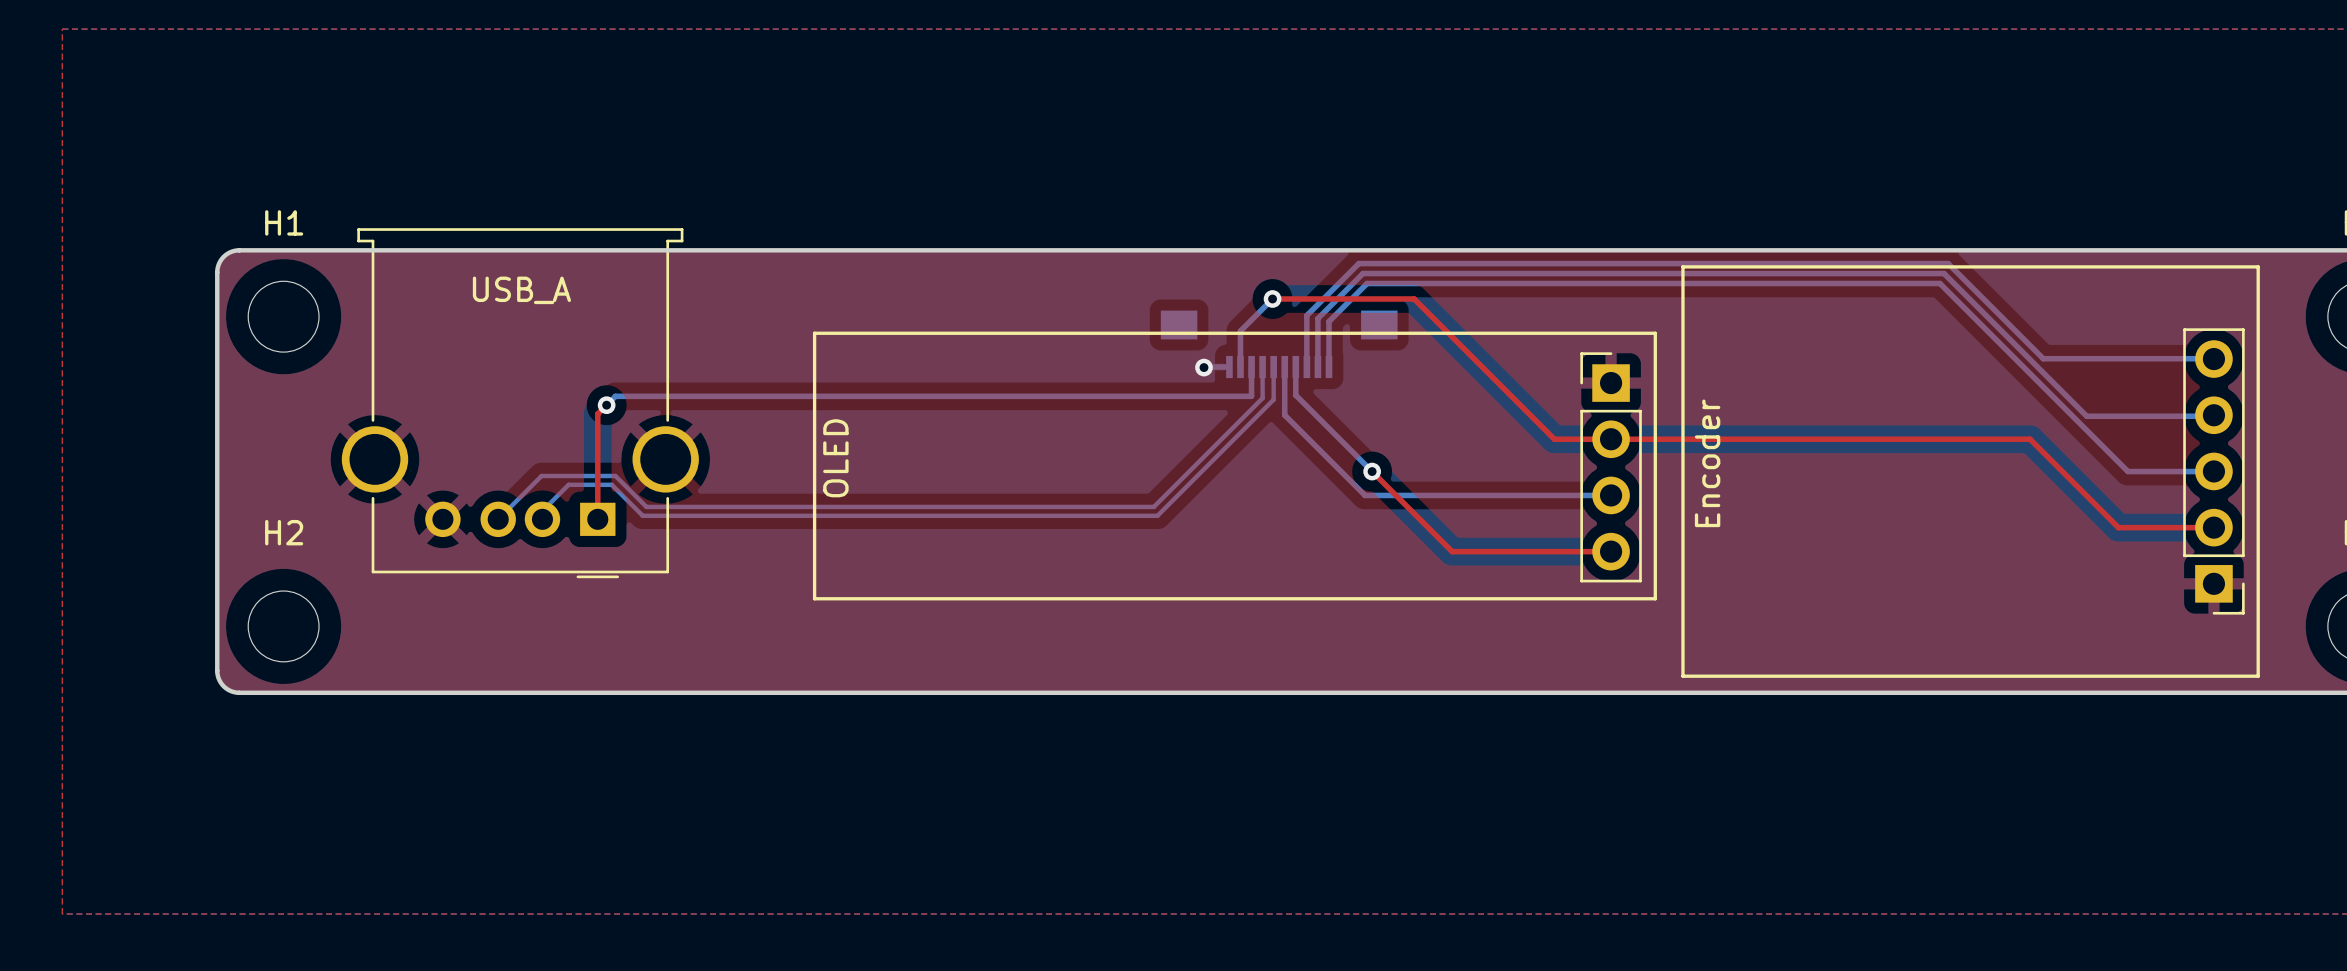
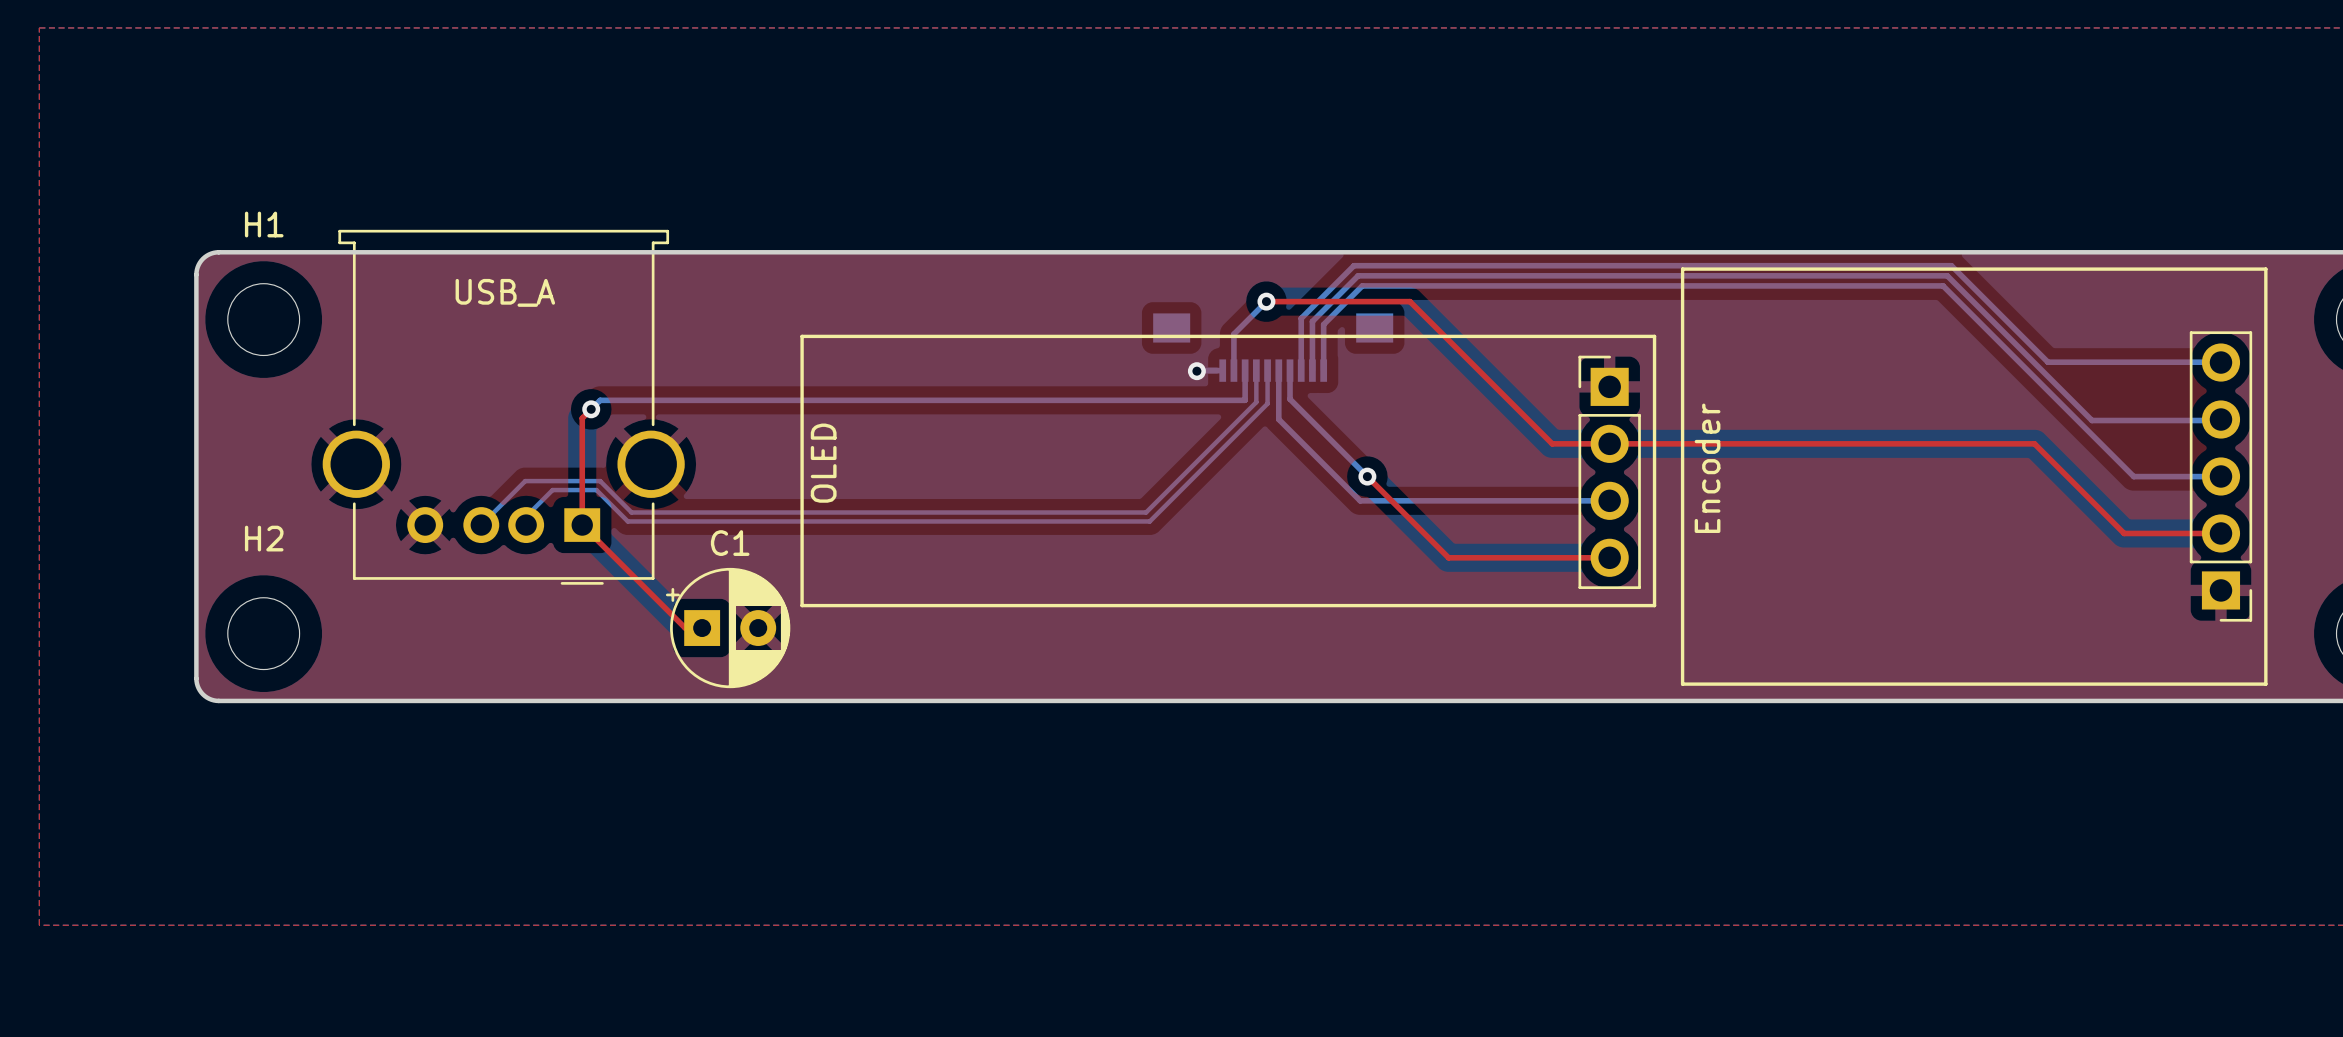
top track: none -> (582, 525) (685, 628) (702, 628)
C1: none -> (728, 628)

